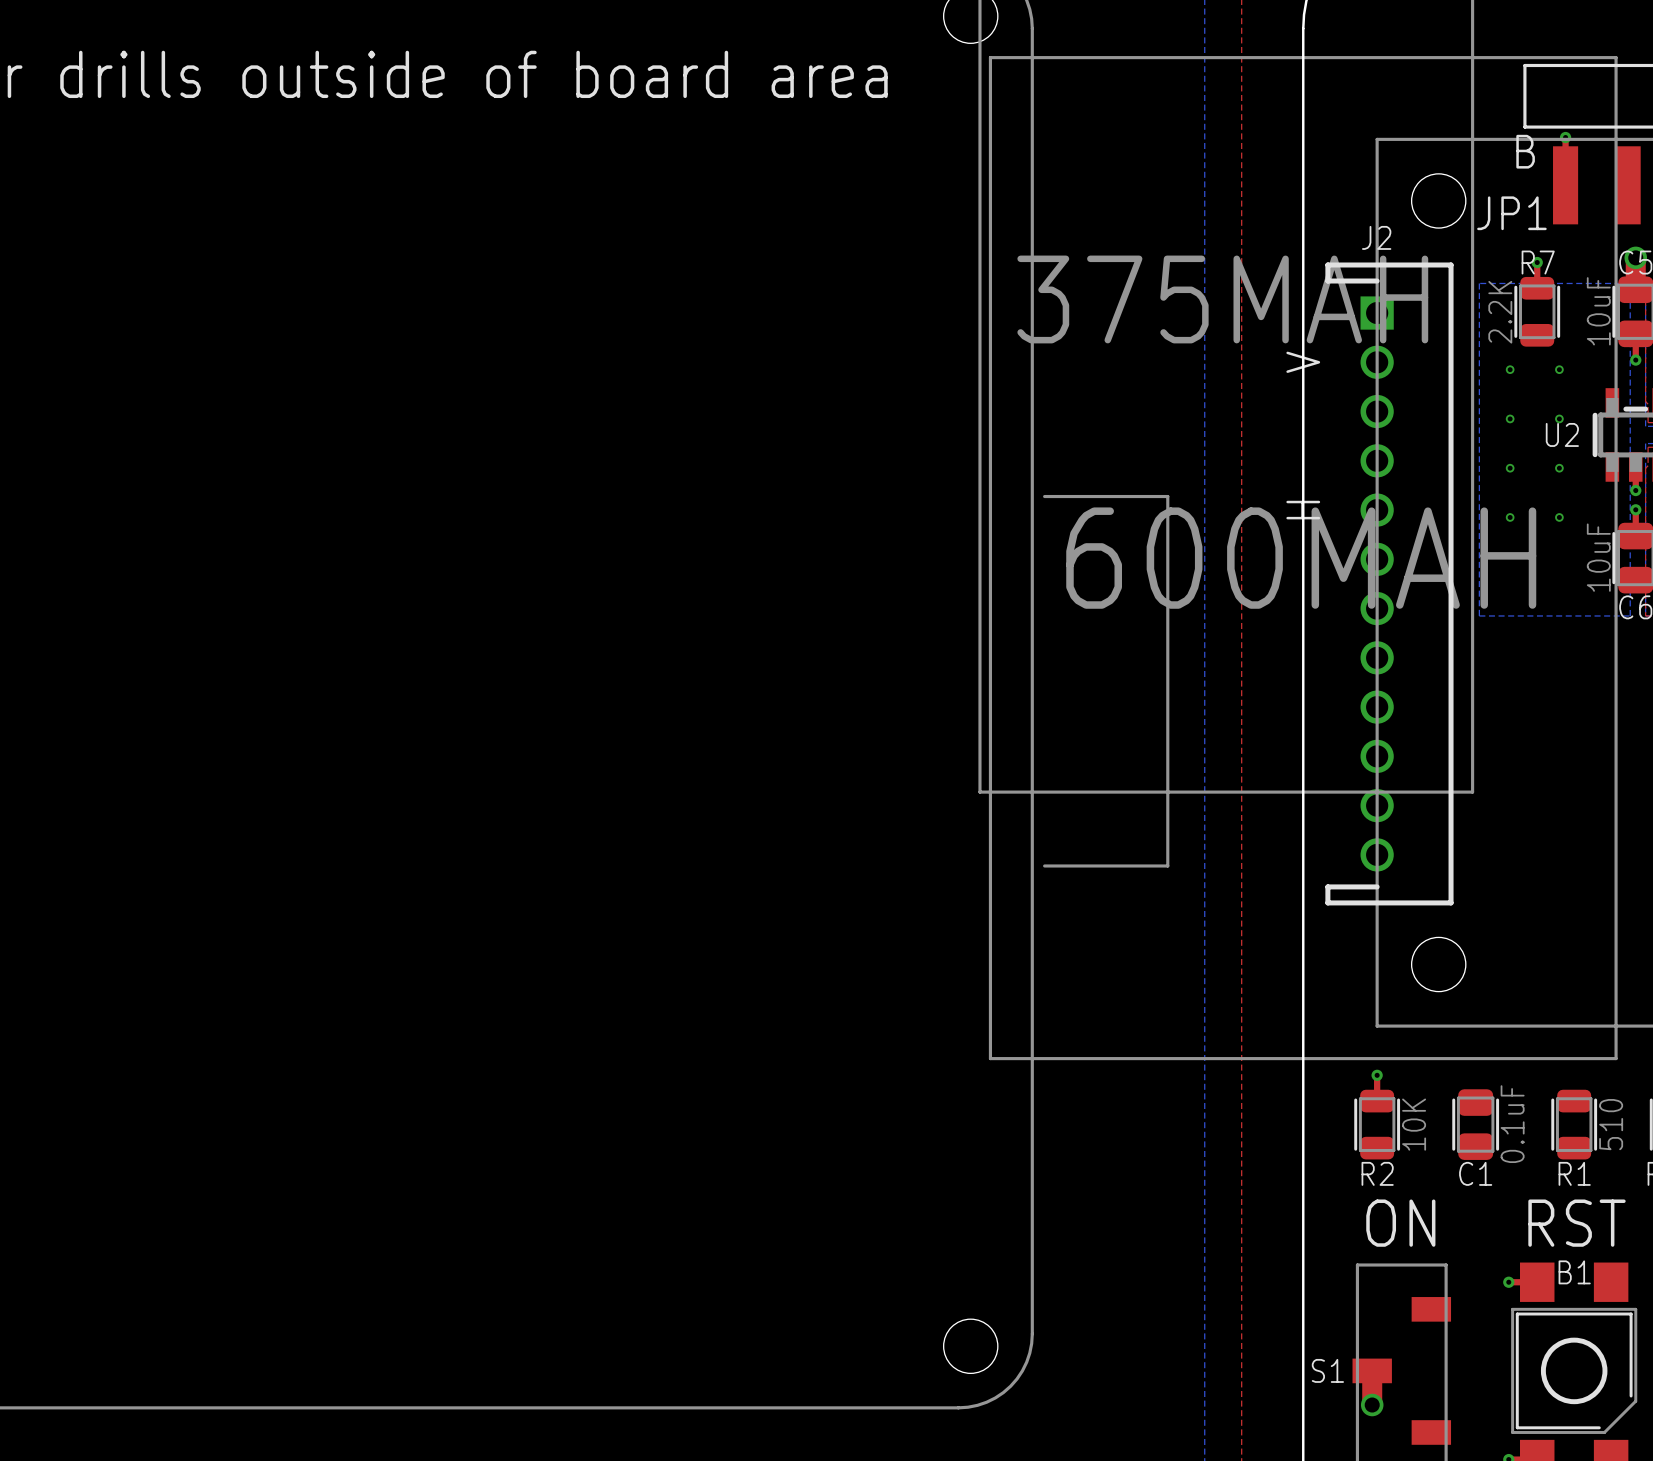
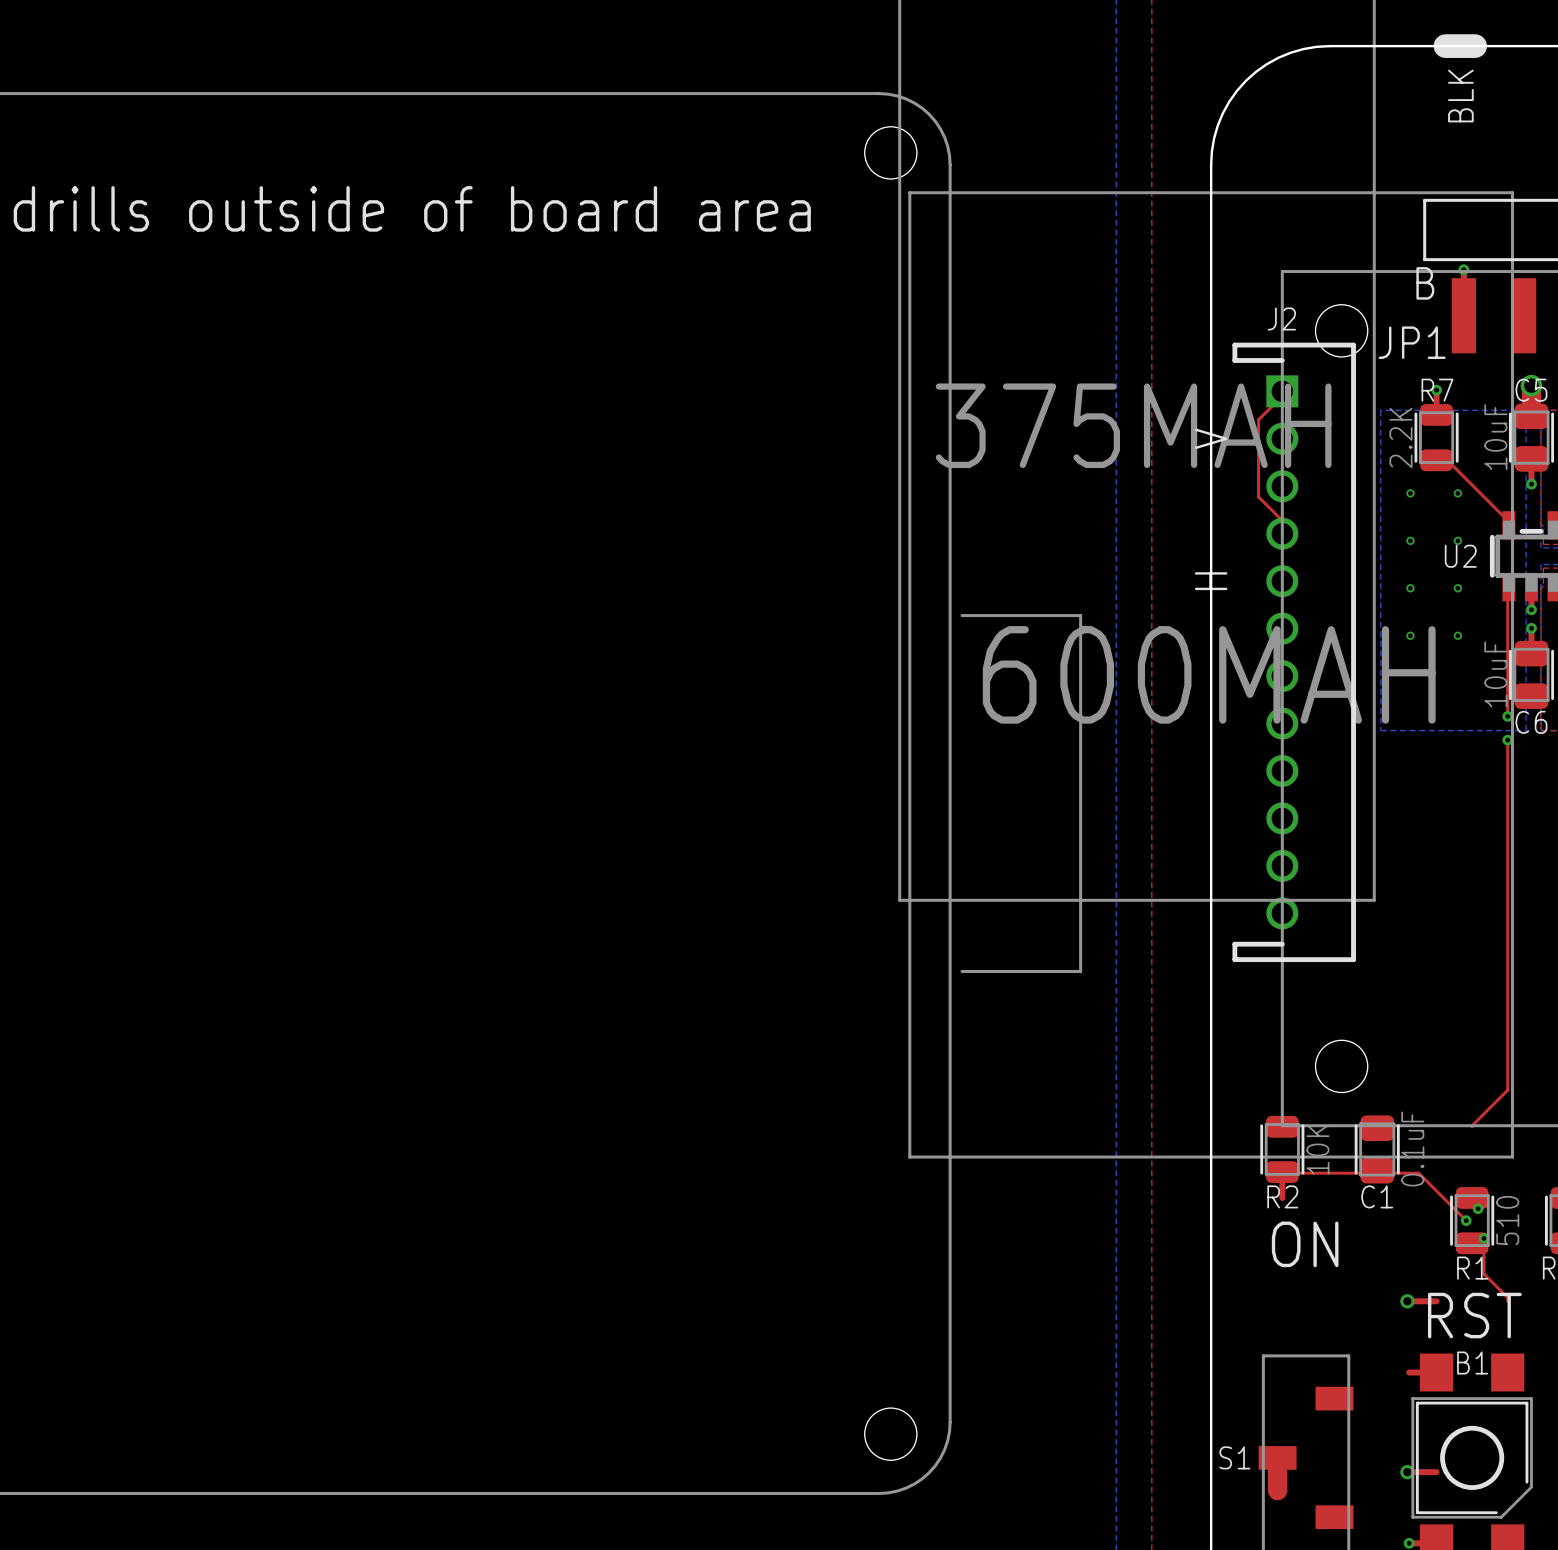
top track: none -> (1282, 391) (1282, 396) (1258, 419) (1258, 496) (1282, 520) (1282, 533)
top track: none -> (1436, 460) (1448, 461) (1507, 520) (1508, 525)
top track: none -> (1508, 587) (1507, 716)
J2 position: (1389, 583) -> (1294, 652)
via: none -> (1507, 716)
top track: none -> (1507, 740) (1507, 1090) (1472, 1126)
via: none -> (1507, 740)
top track: none -> (1282, 1172) (1418, 1173) (1466, 1220)
via: (1377, 1075) -> none
via: none -> (1478, 1208)
R2 position: (1377, 1124) -> (1282, 1149)
C1 position: (1475, 1124) -> (1377, 1149)
via: none -> (1466, 1220)
top track: none -> (1484, 1238) (1484, 1274) (1507, 1297) (1507, 1301)
via: none -> (1484, 1238)
top track: none -> (1407, 1301) (1436, 1301)
via: none -> (1407, 1301)
text position: ON (1400, 1223) -> ON (1305, 1244)
via: (1508, 1282) -> none
top track: none -> (1407, 1472) (1436, 1472)
via: none -> (1407, 1472)
via: (1372, 1405) -> none

